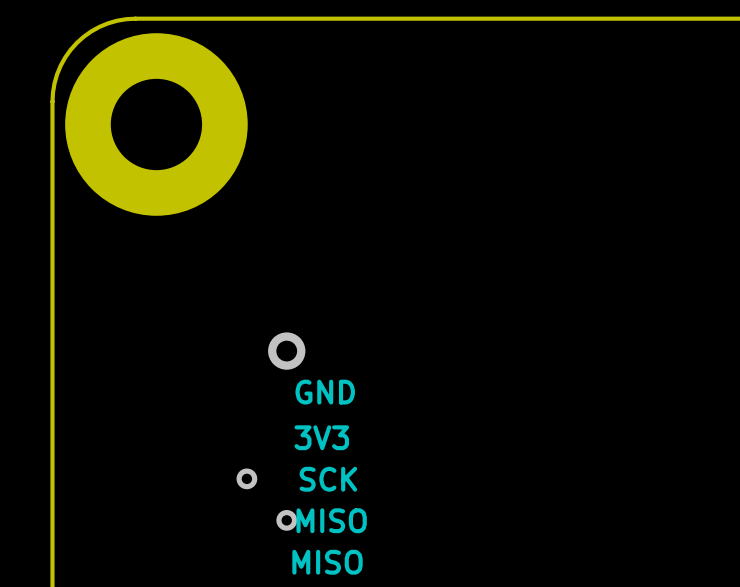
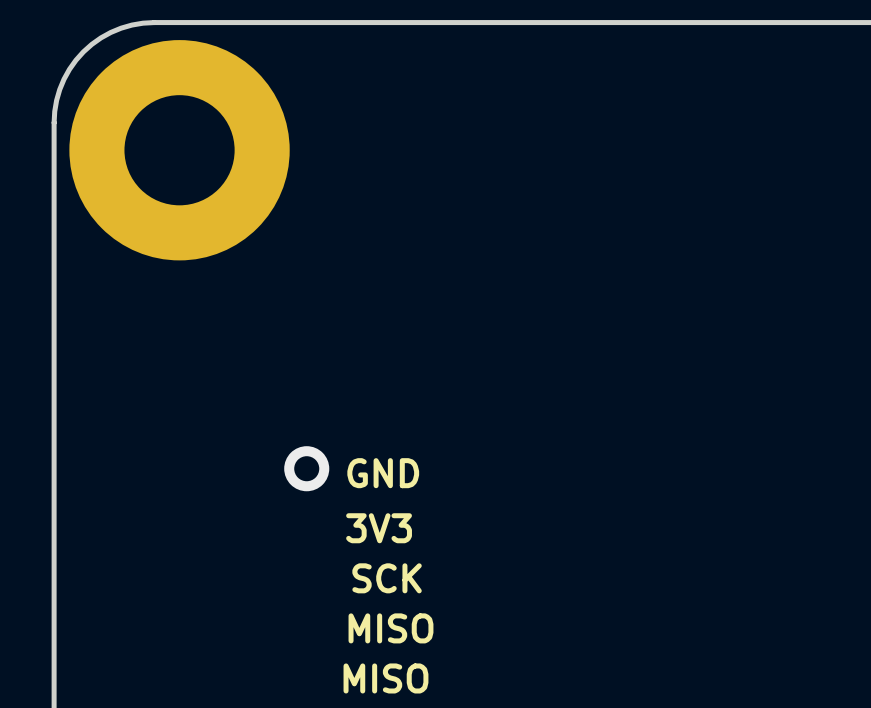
via position: (286, 351) -> (306, 468)
via: (246, 478) -> none
via: (286, 520) -> none

